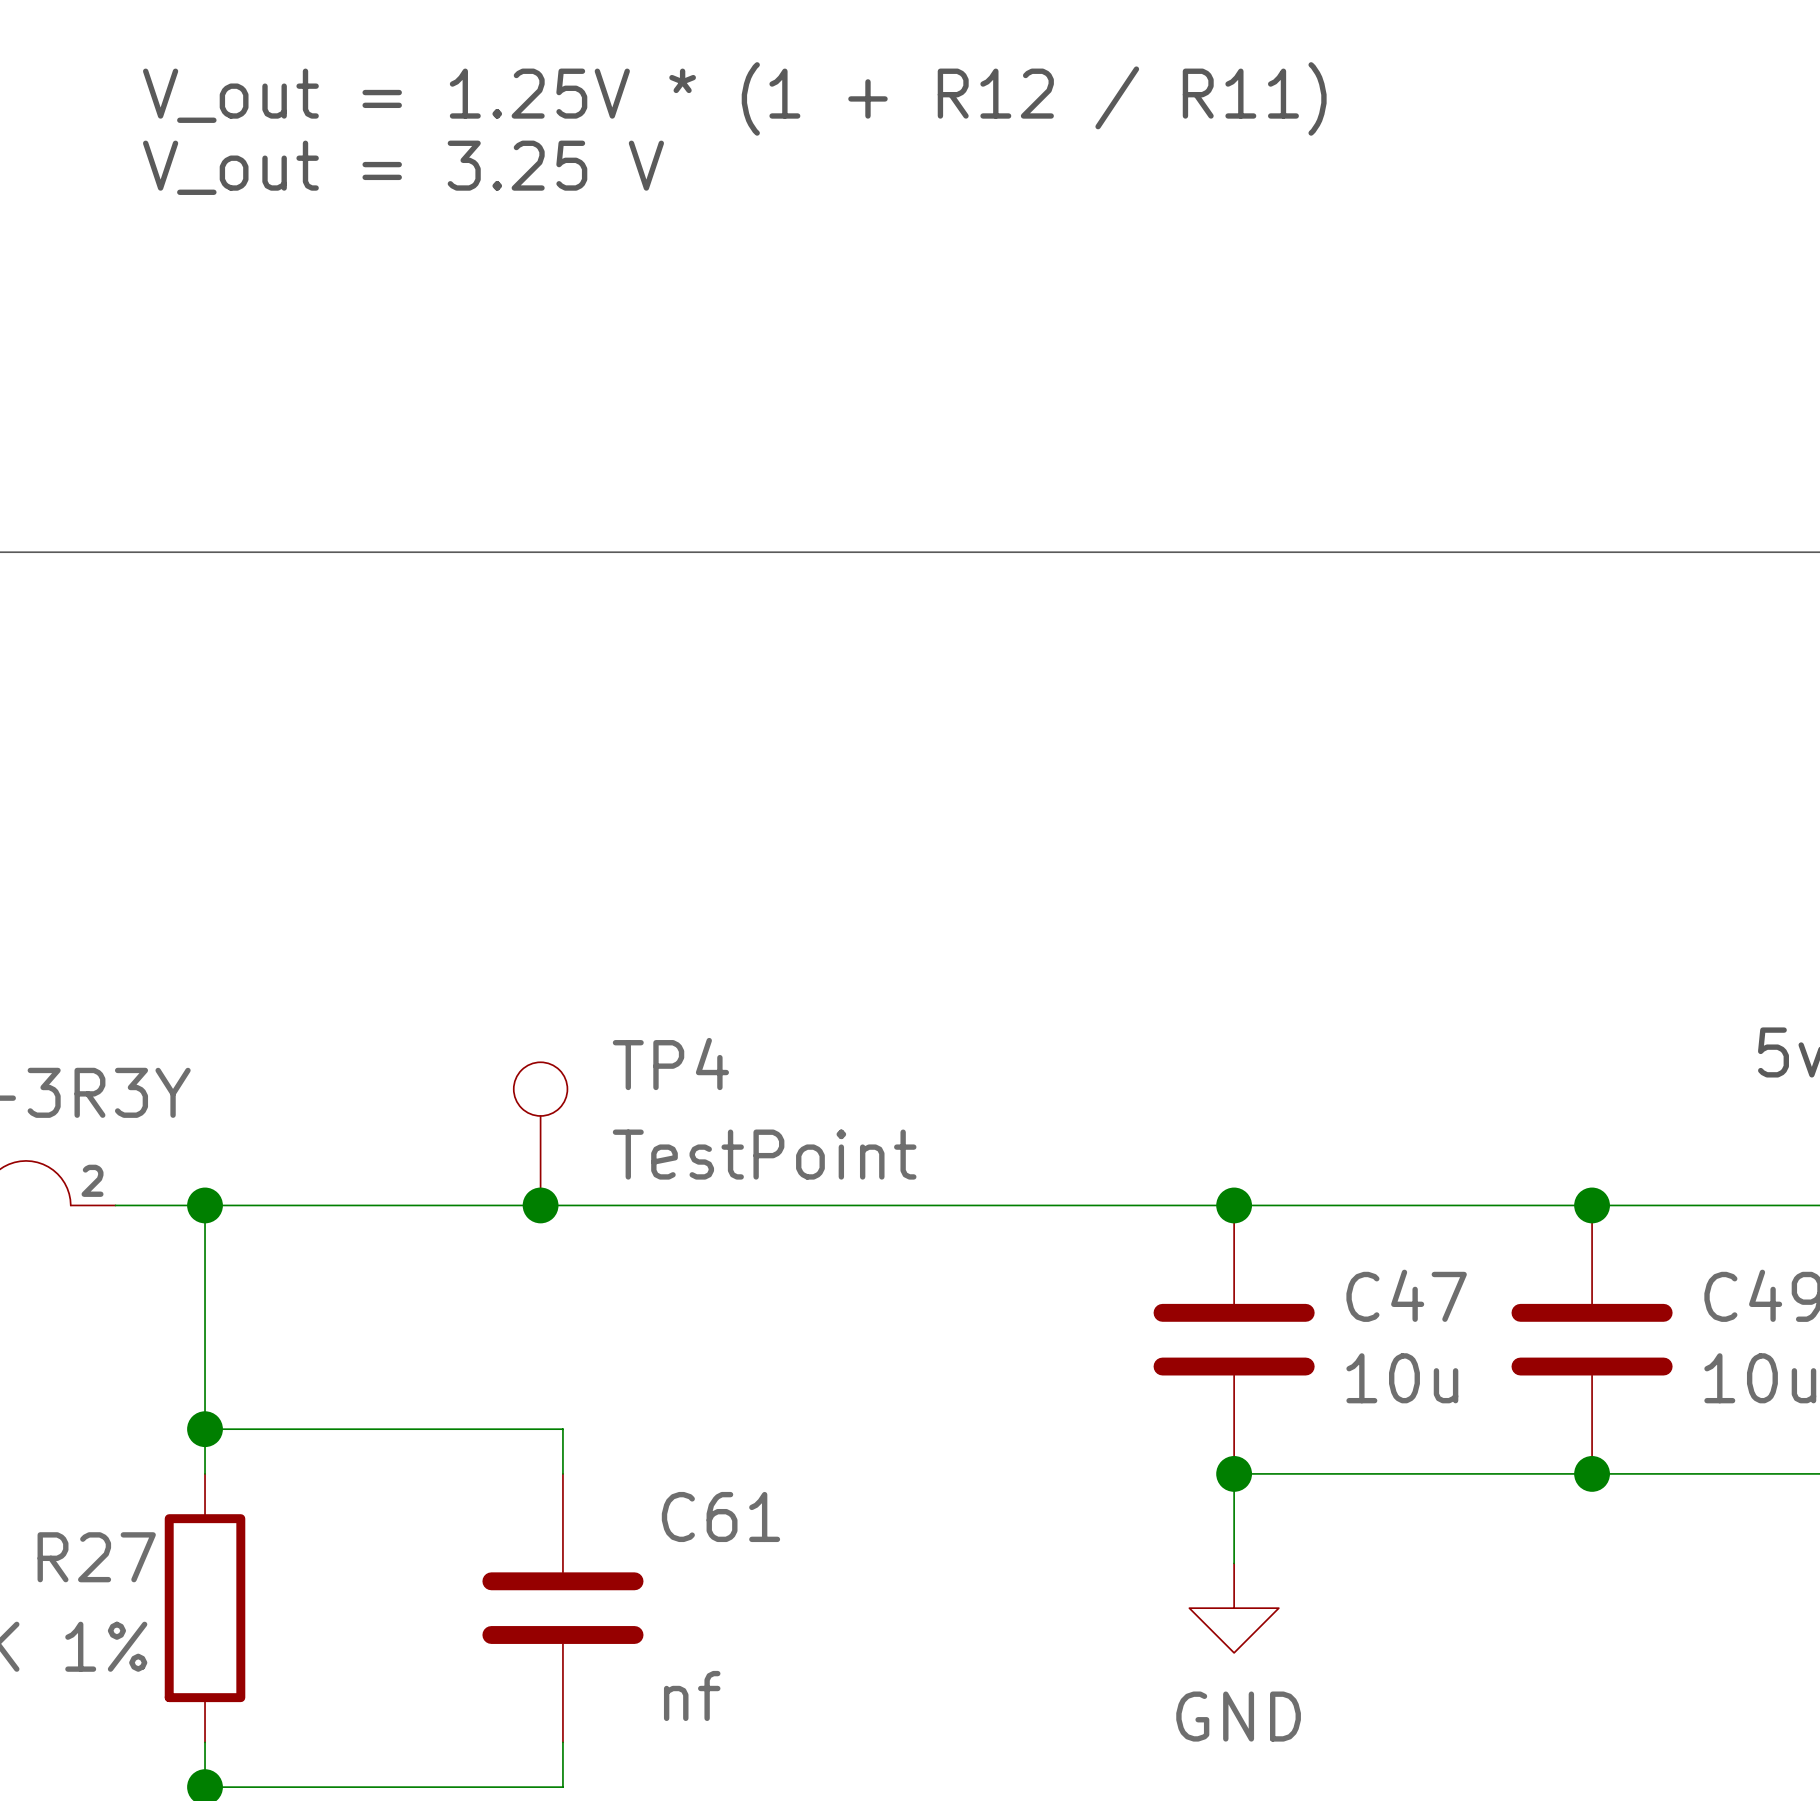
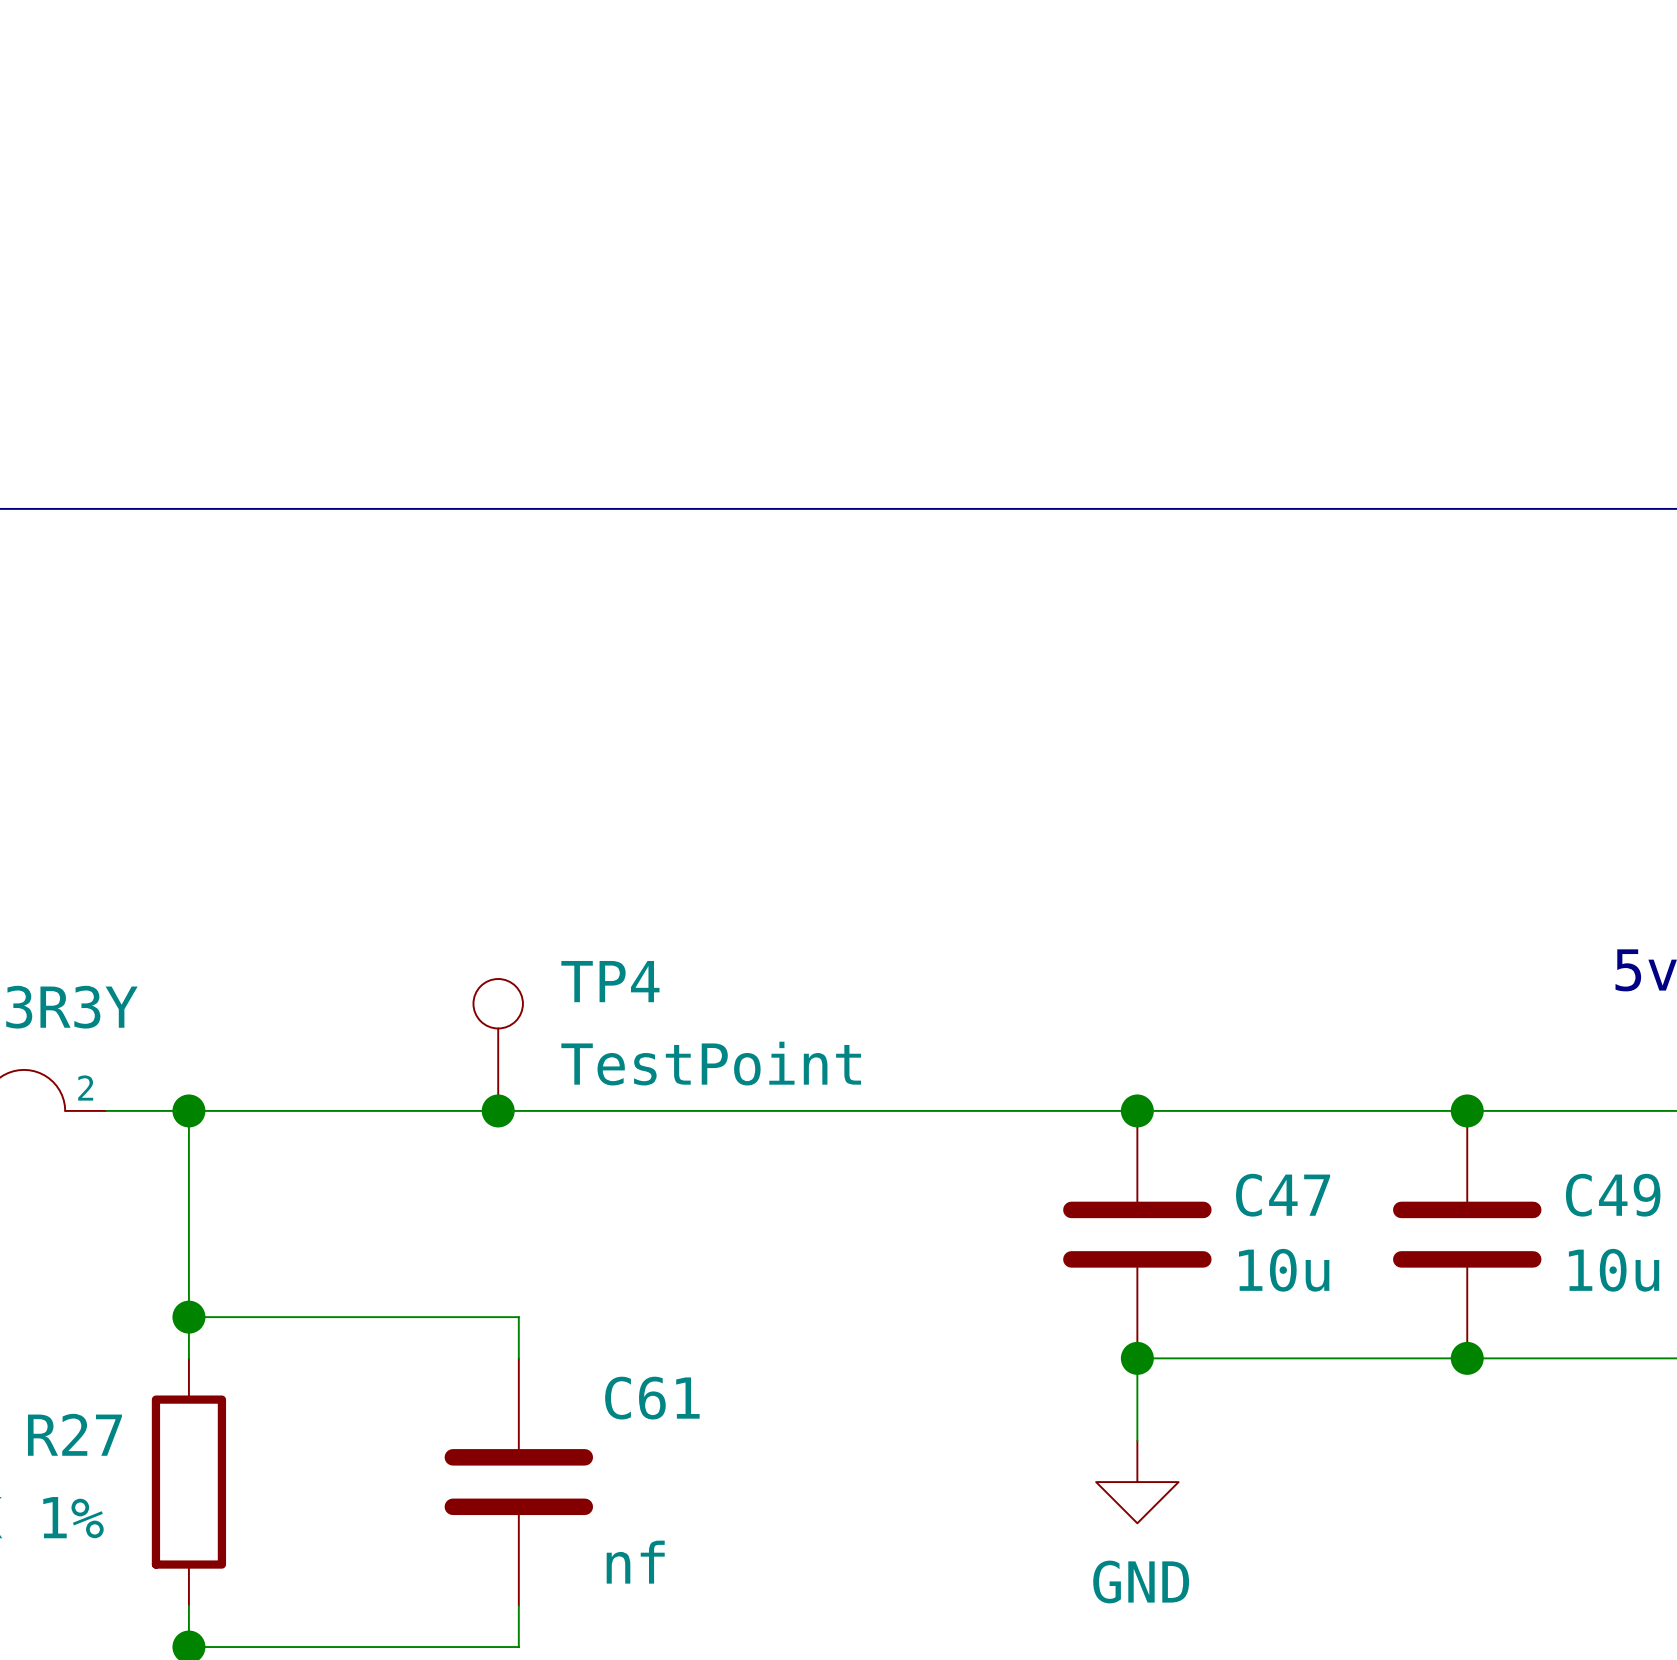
text: V_out = 1.25V * (1 + R12 / R11) (734, 98) -> none
text: V_out = 3.25 V (403, 167) -> none

